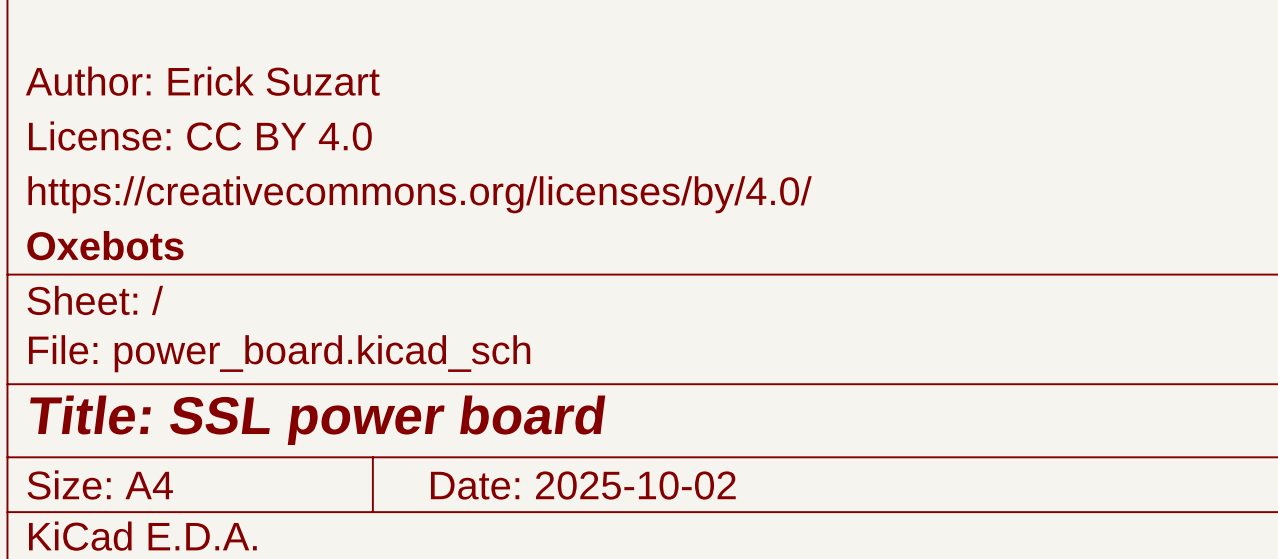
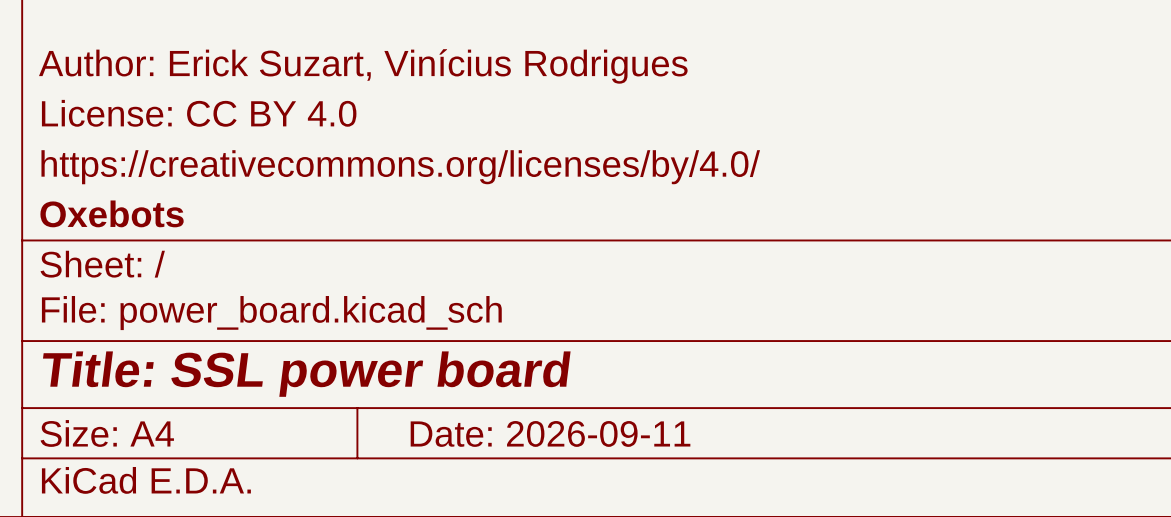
title block: Author: Erick Suzart (202, 81) -> Author: Erick Suzart, Vinícius Rodrigues (363, 66)
title block: Date: 2025-10-02 (583, 485) -> Date: 2026-09-11 (550, 433)

